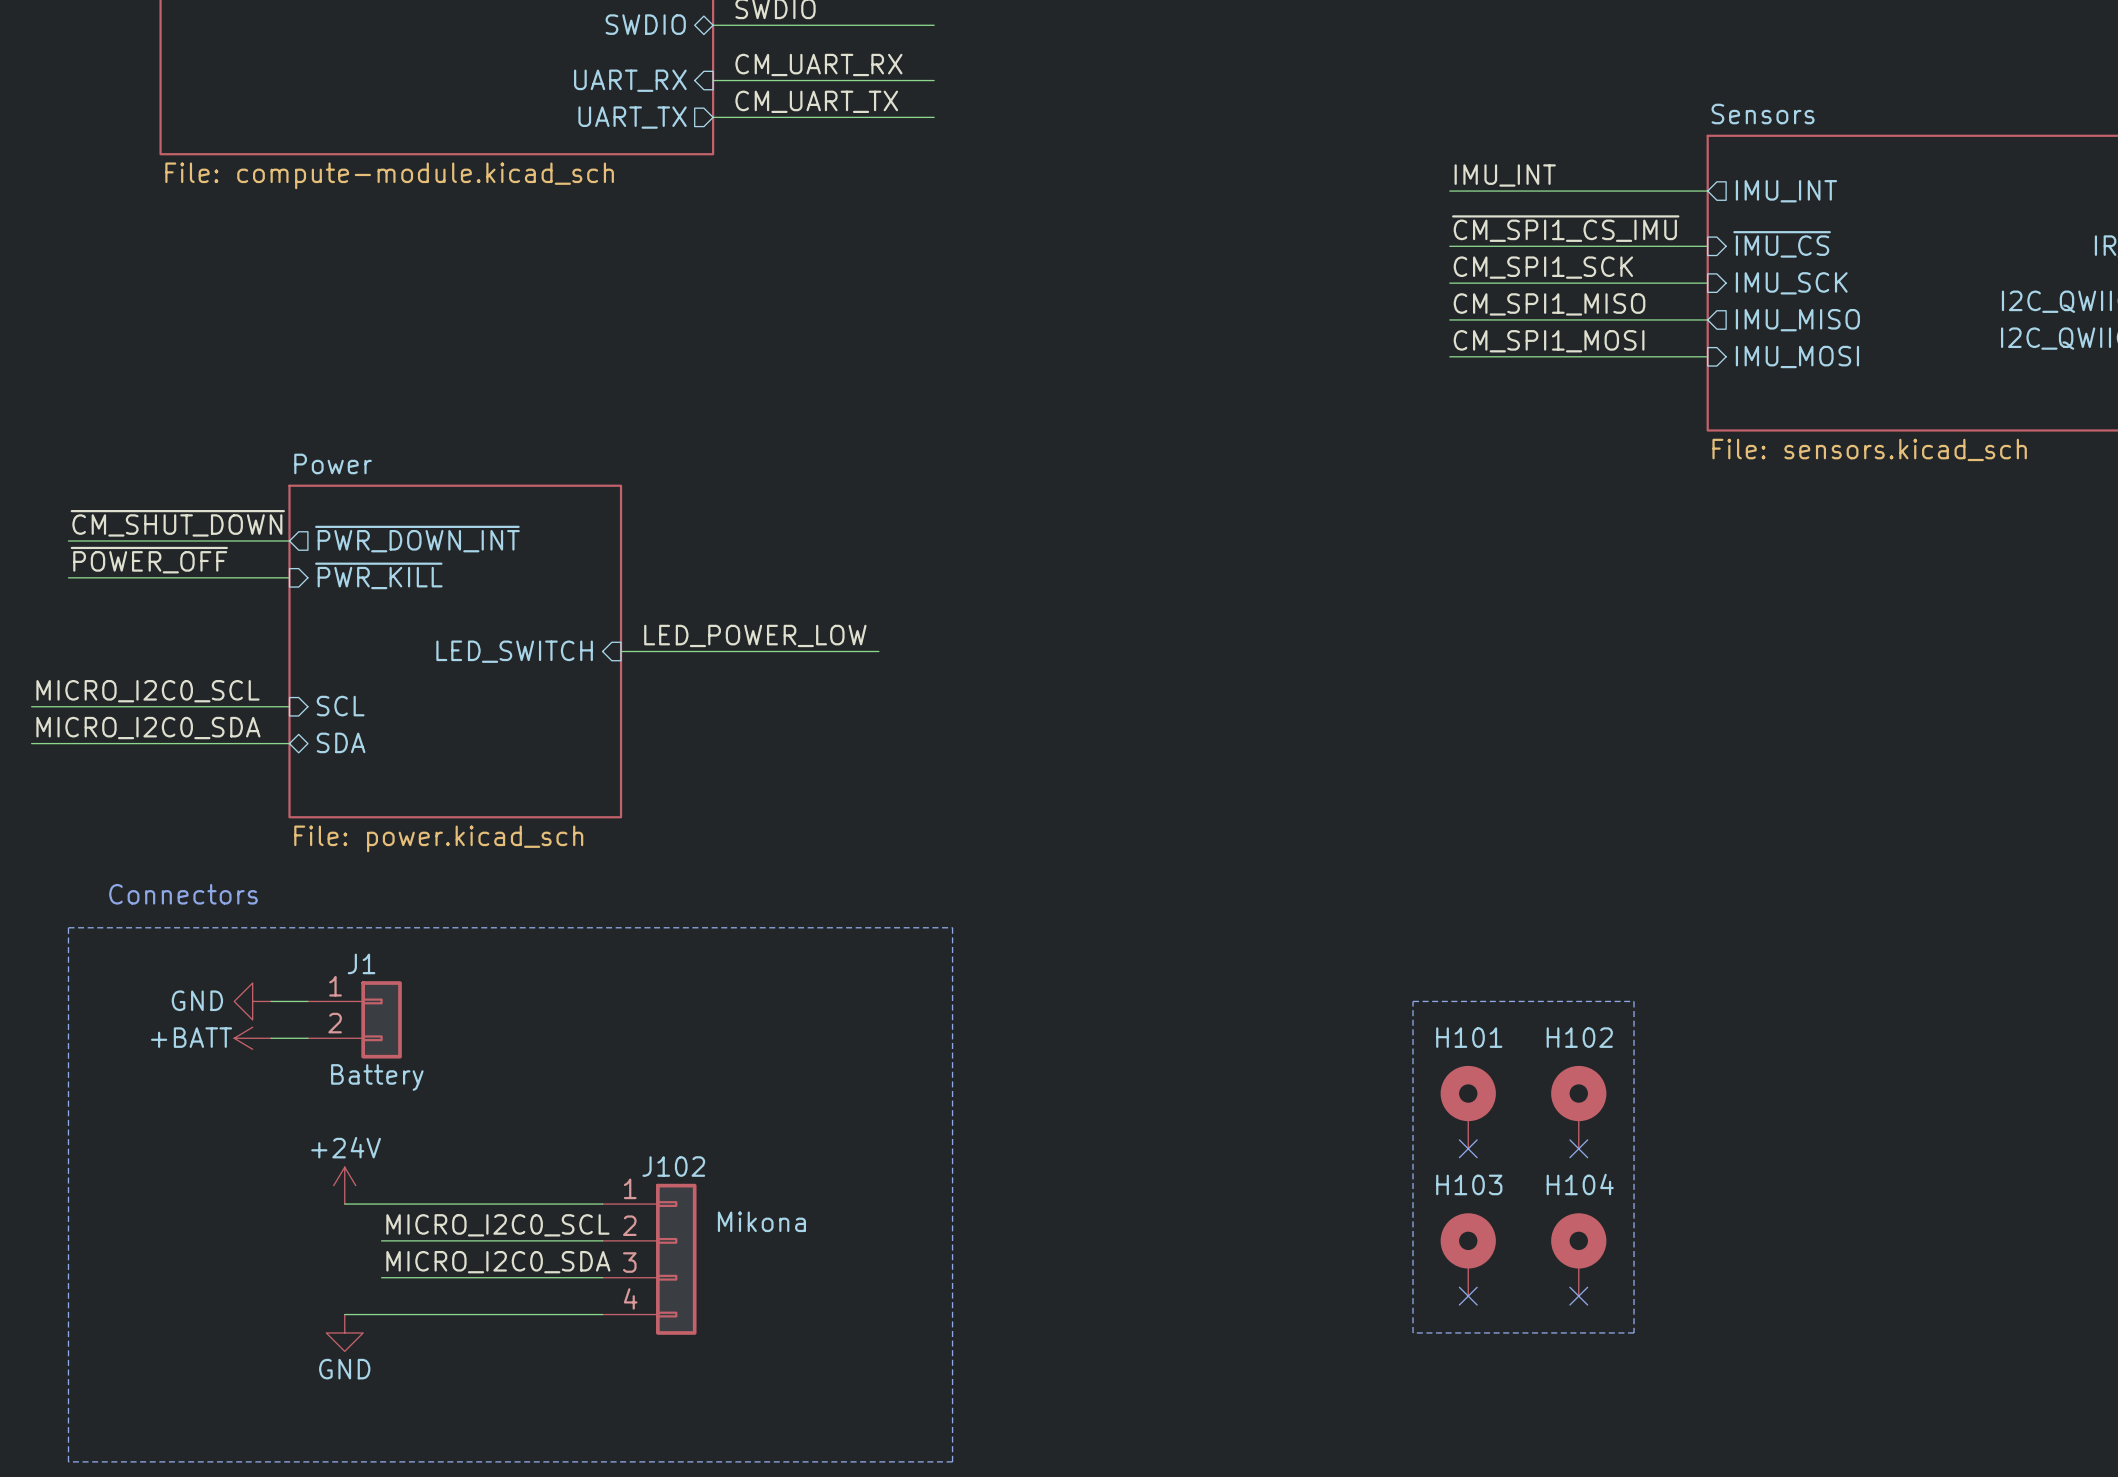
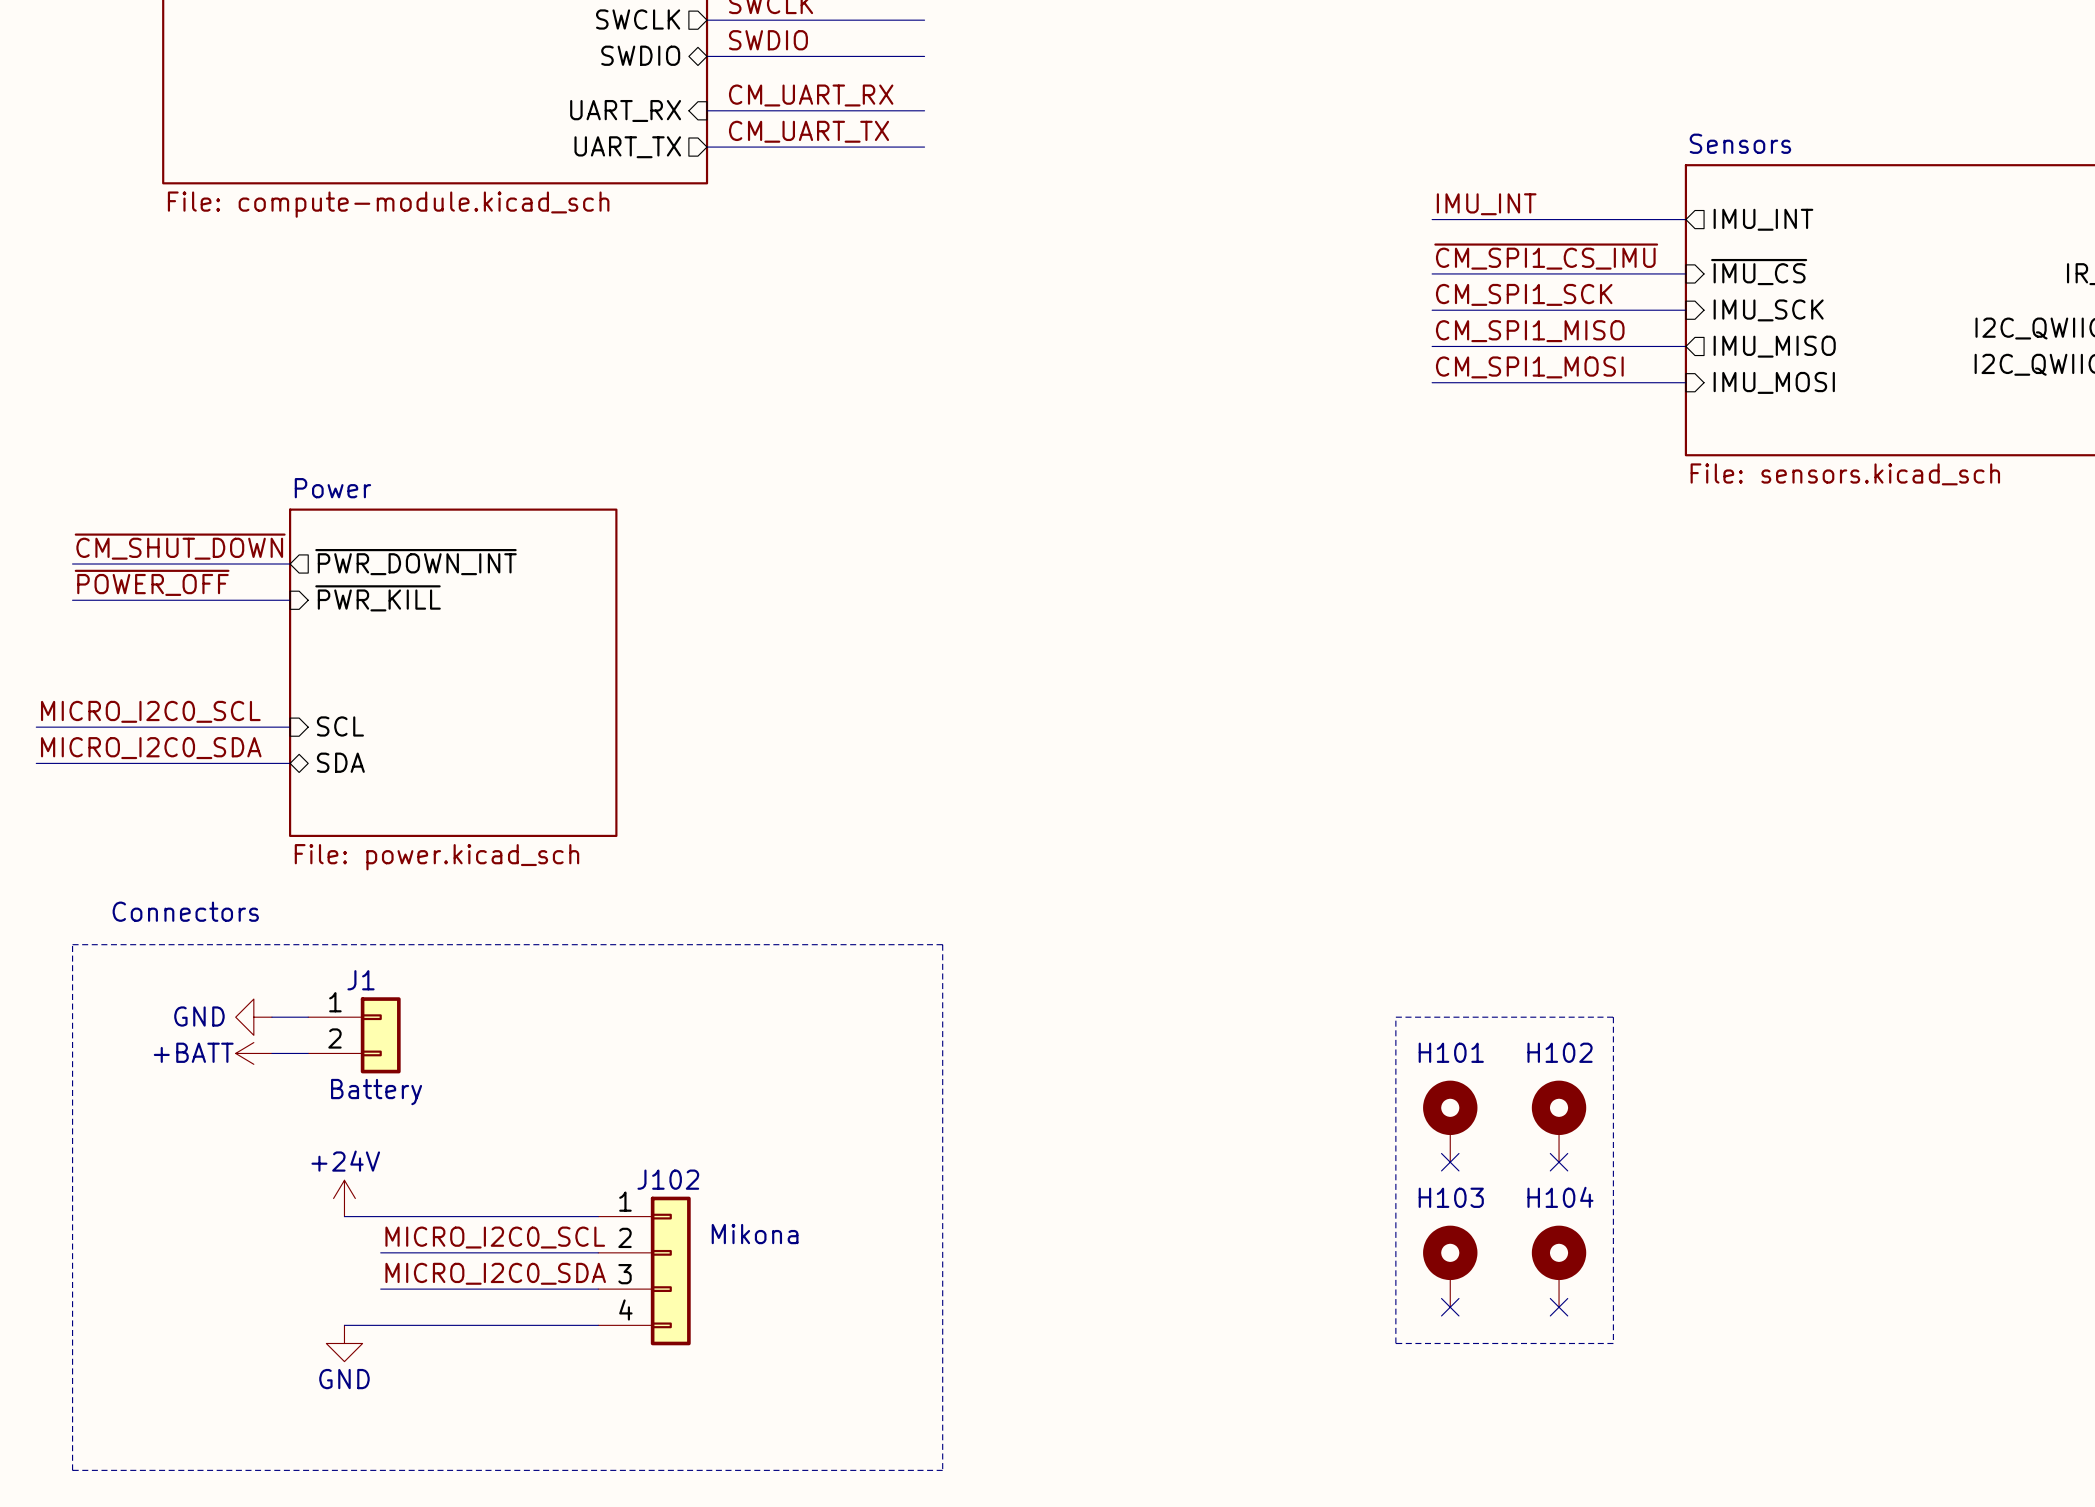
label: LED_POWER_LOW (755, 635) -> none
sheet pin: LED_SWITCH (514, 651) -> none
wire: (621, 651) (878, 651) -> none

